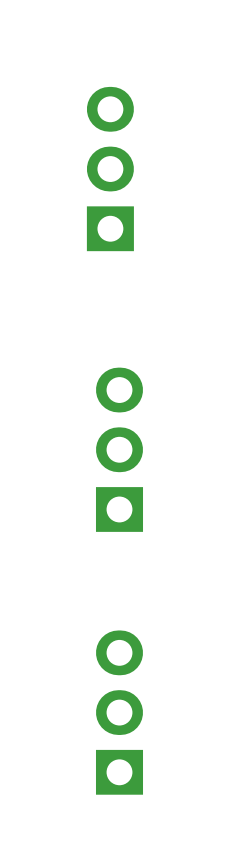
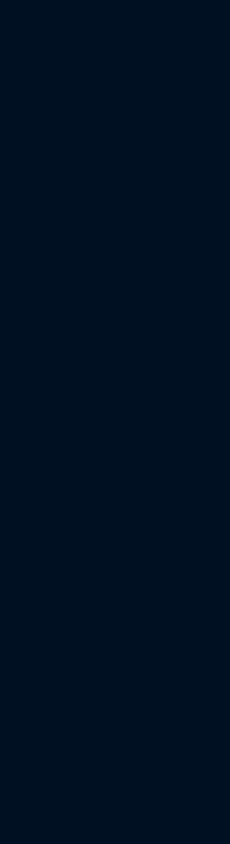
part: (110, 169) -> none
part: (119, 449) -> none
part: (119, 712) -> none

